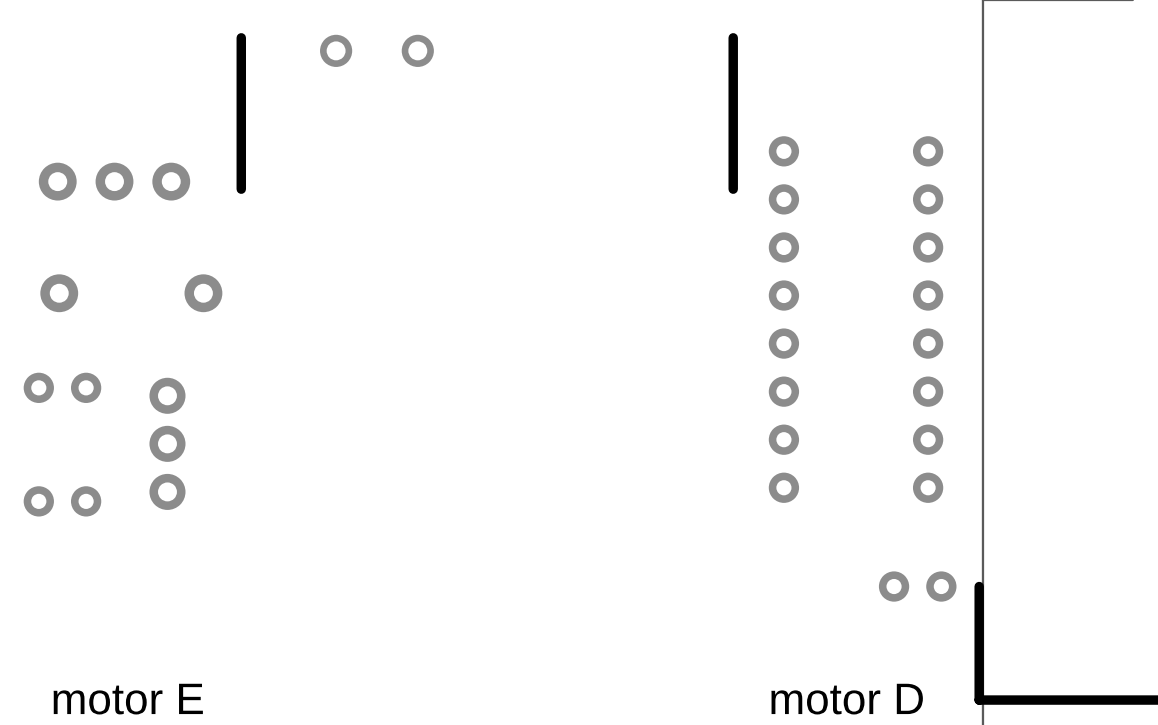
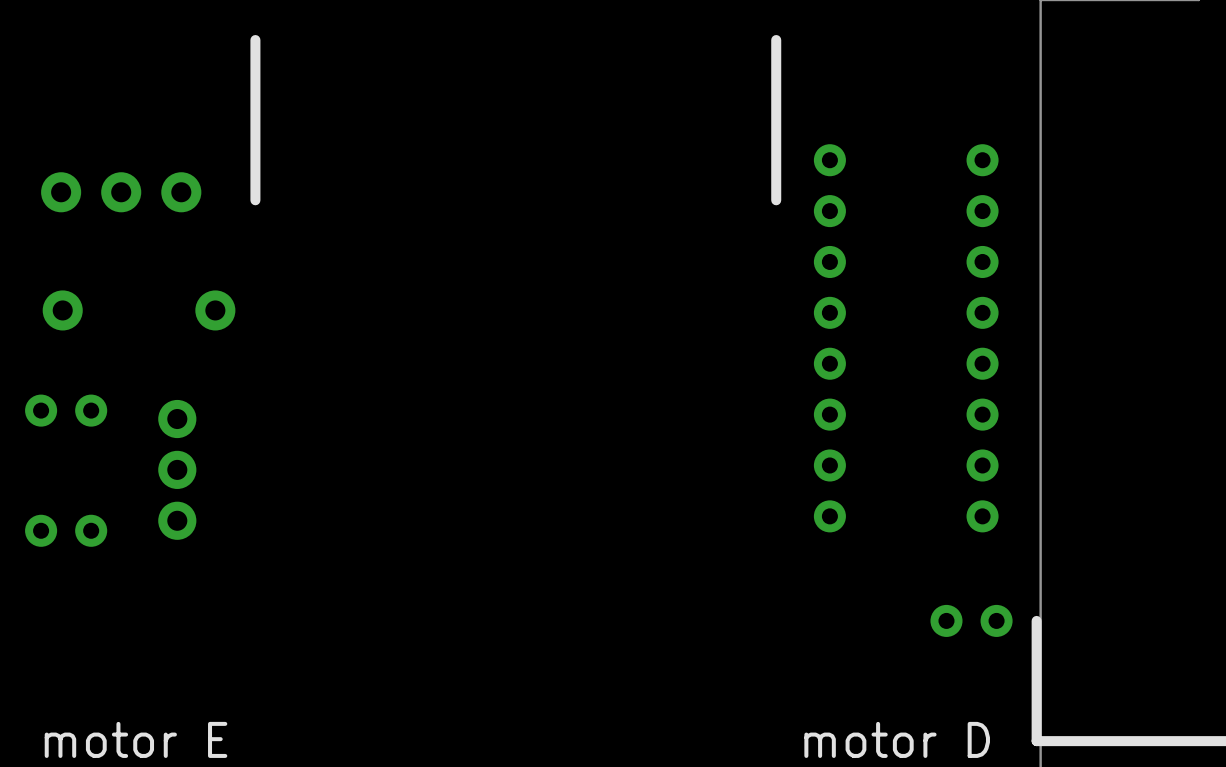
part: (336, 50) -> none
part: (417, 50) -> none

